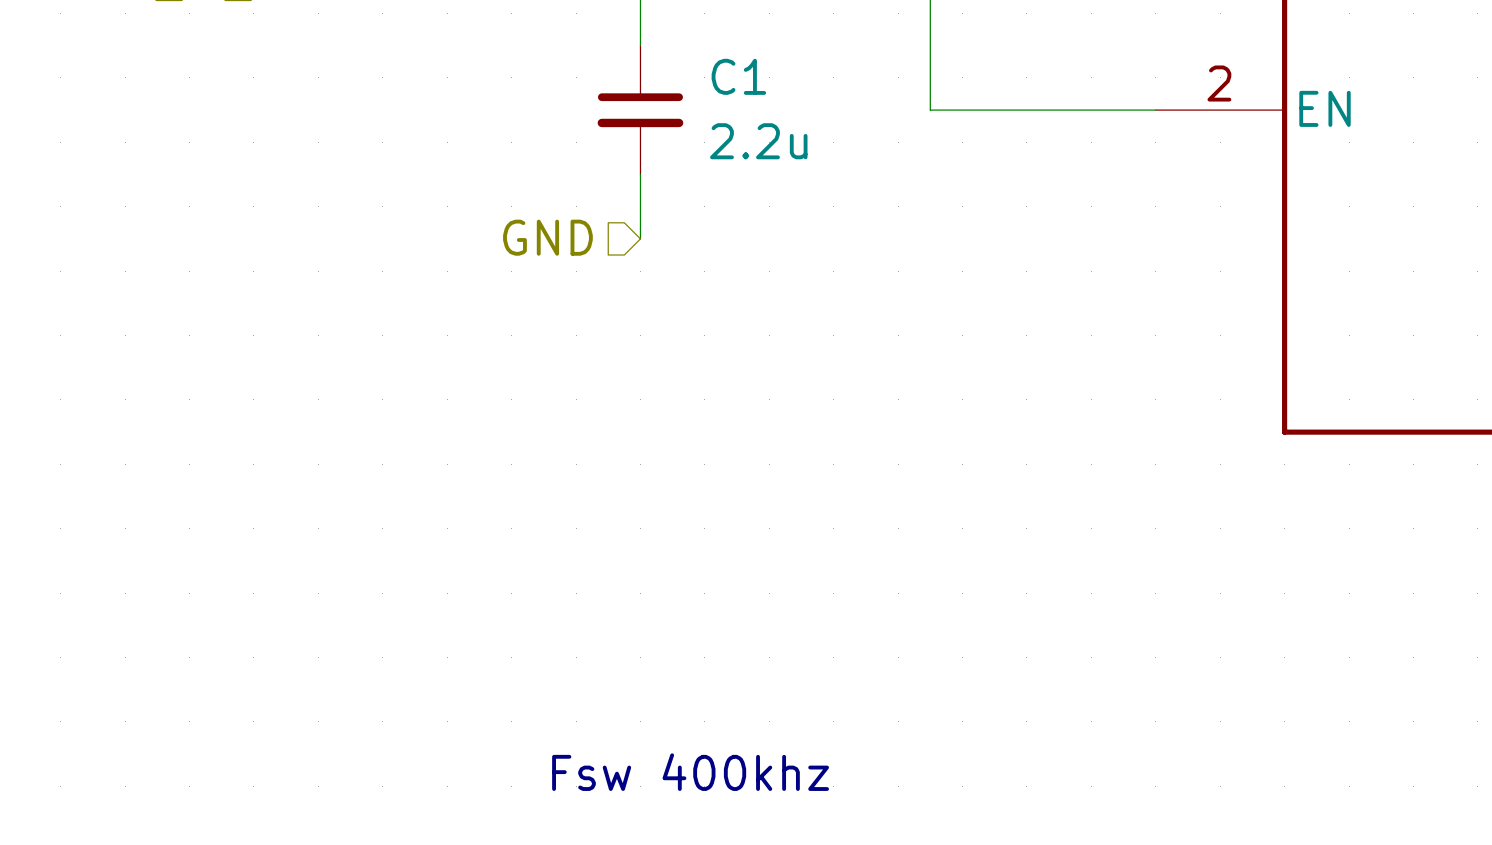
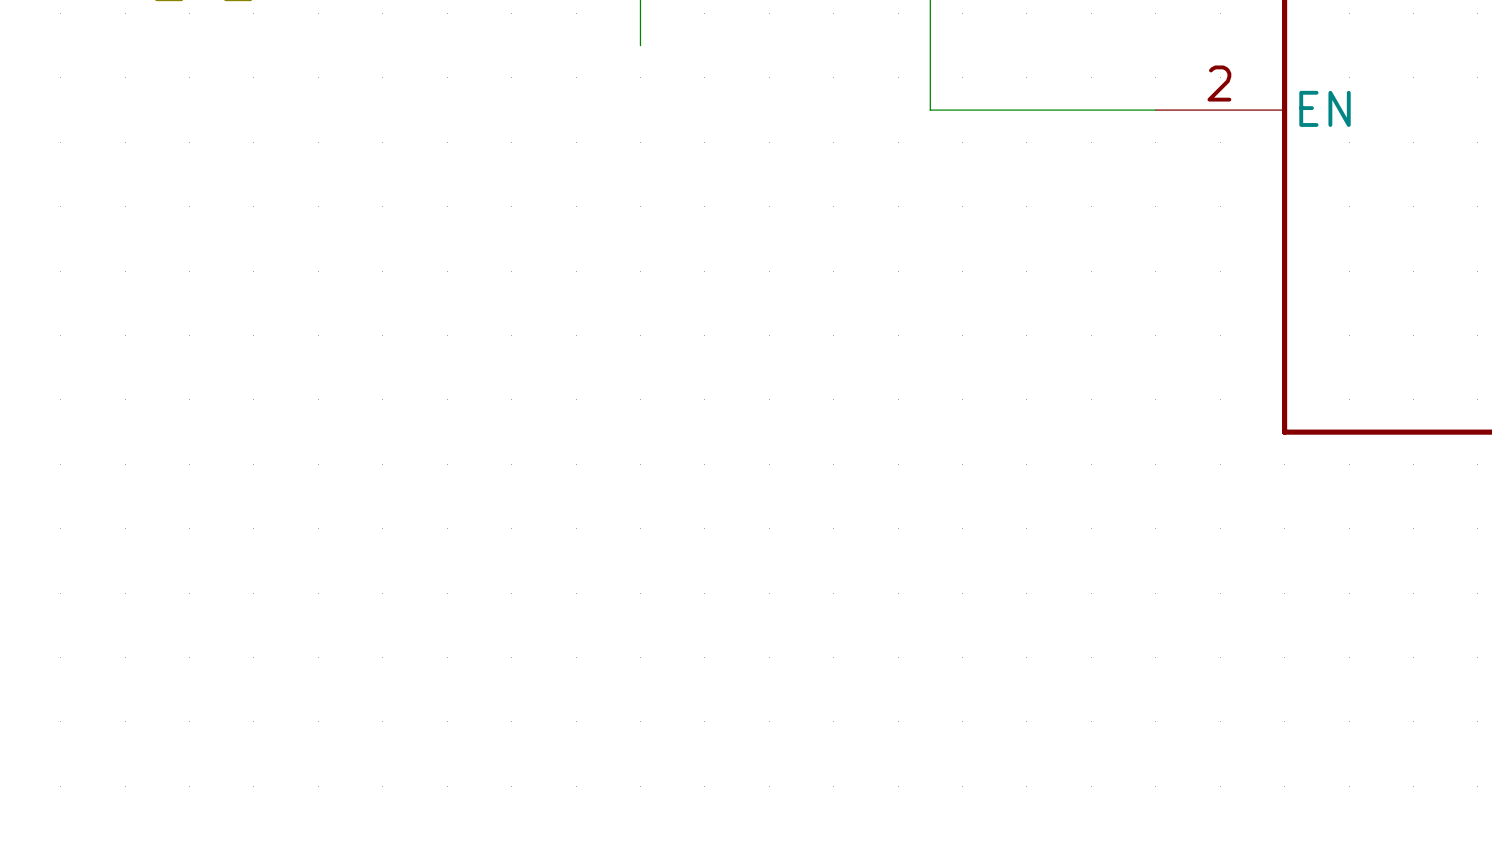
C1: 2.2u (640, 110) -> none
wire: (640, 174) (640, 238) -> none
hierarchical label: GND (547, 237) -> none
text: Fsw 400khz (690, 772) -> none

